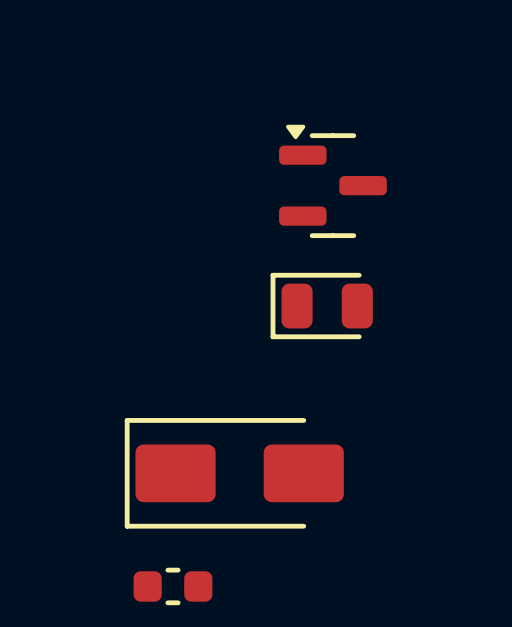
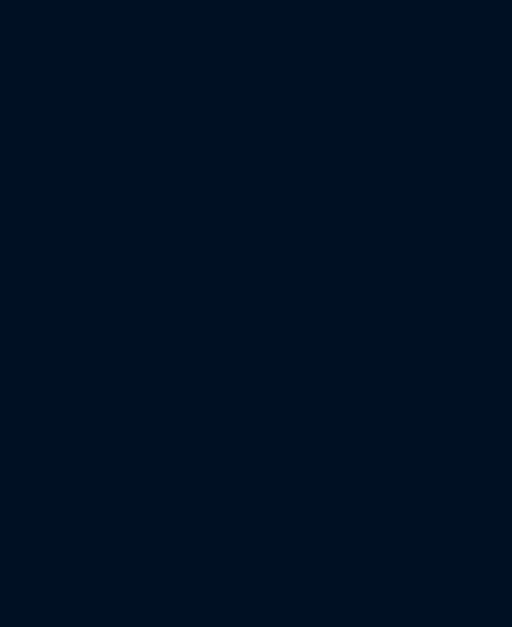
part: (332, 181) -> none
part: (321, 306) -> none
part: (234, 473) -> none
part: (172, 586) -> none

